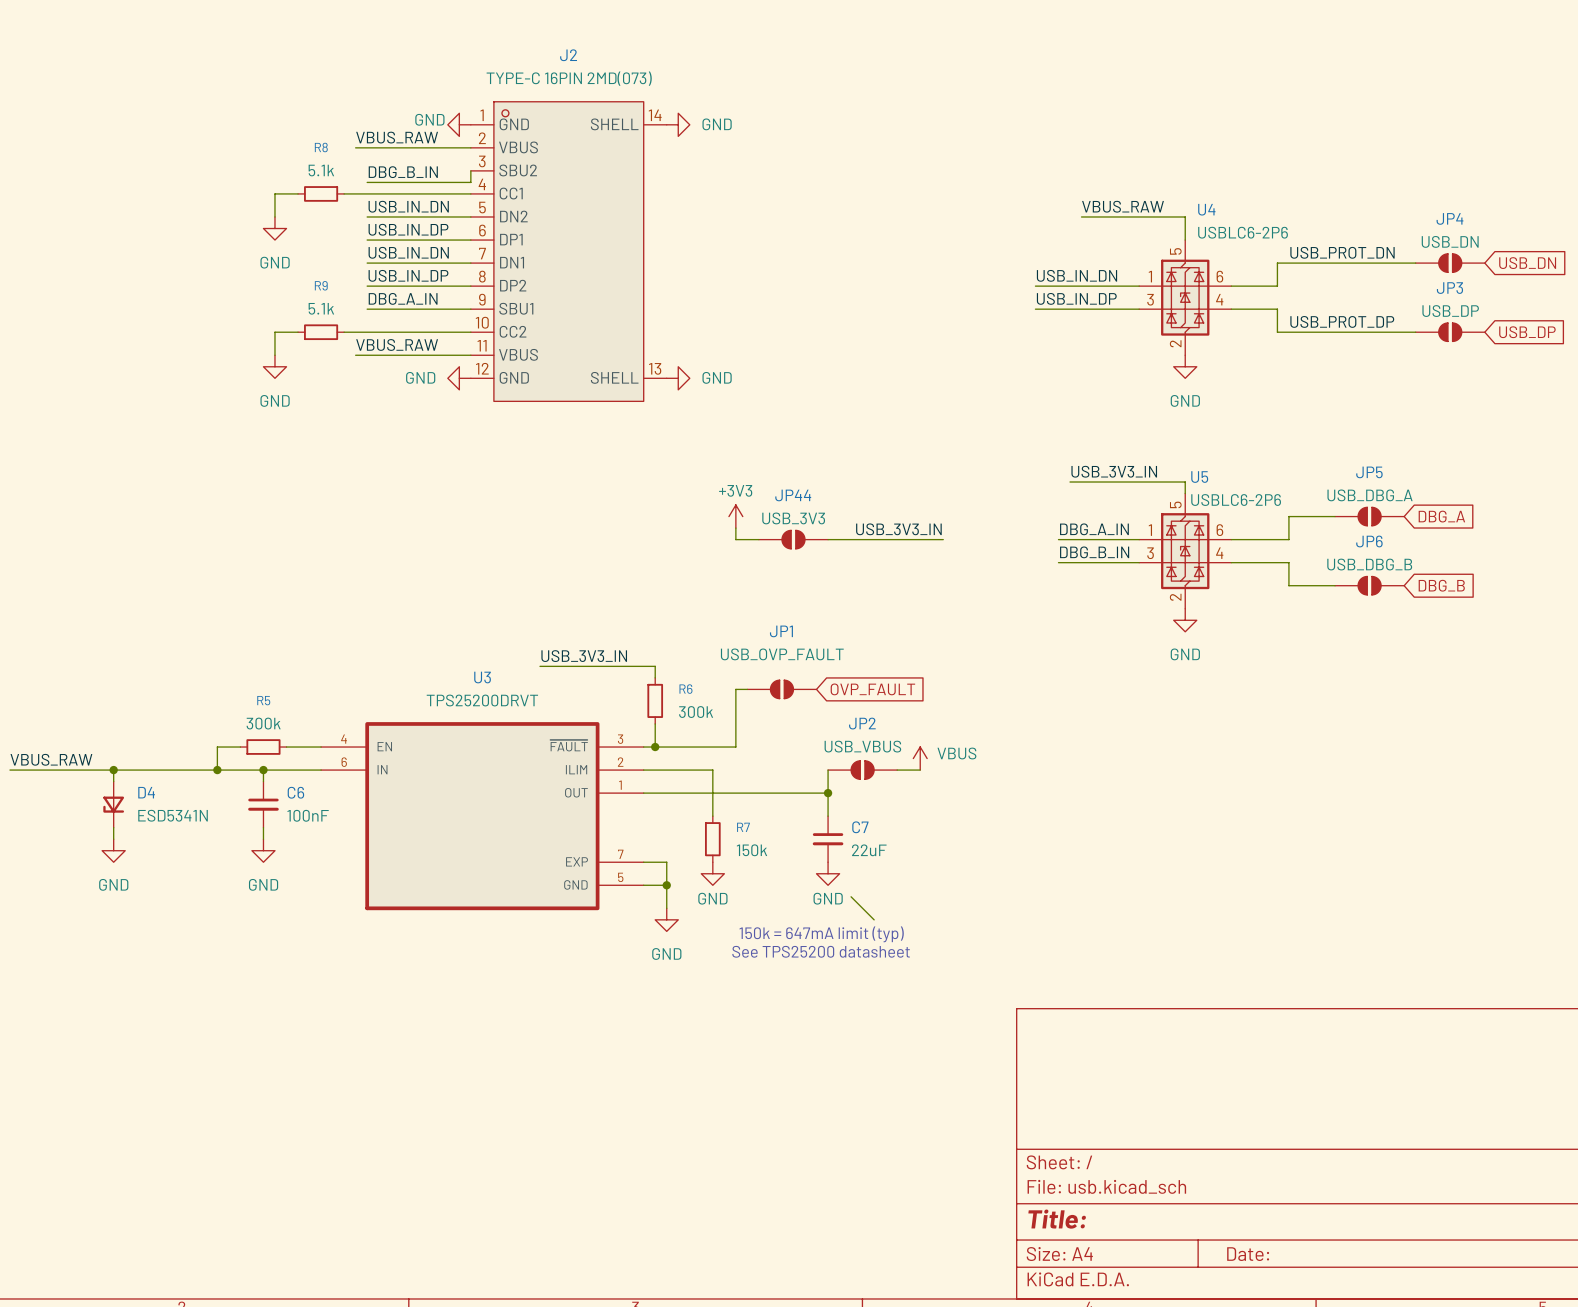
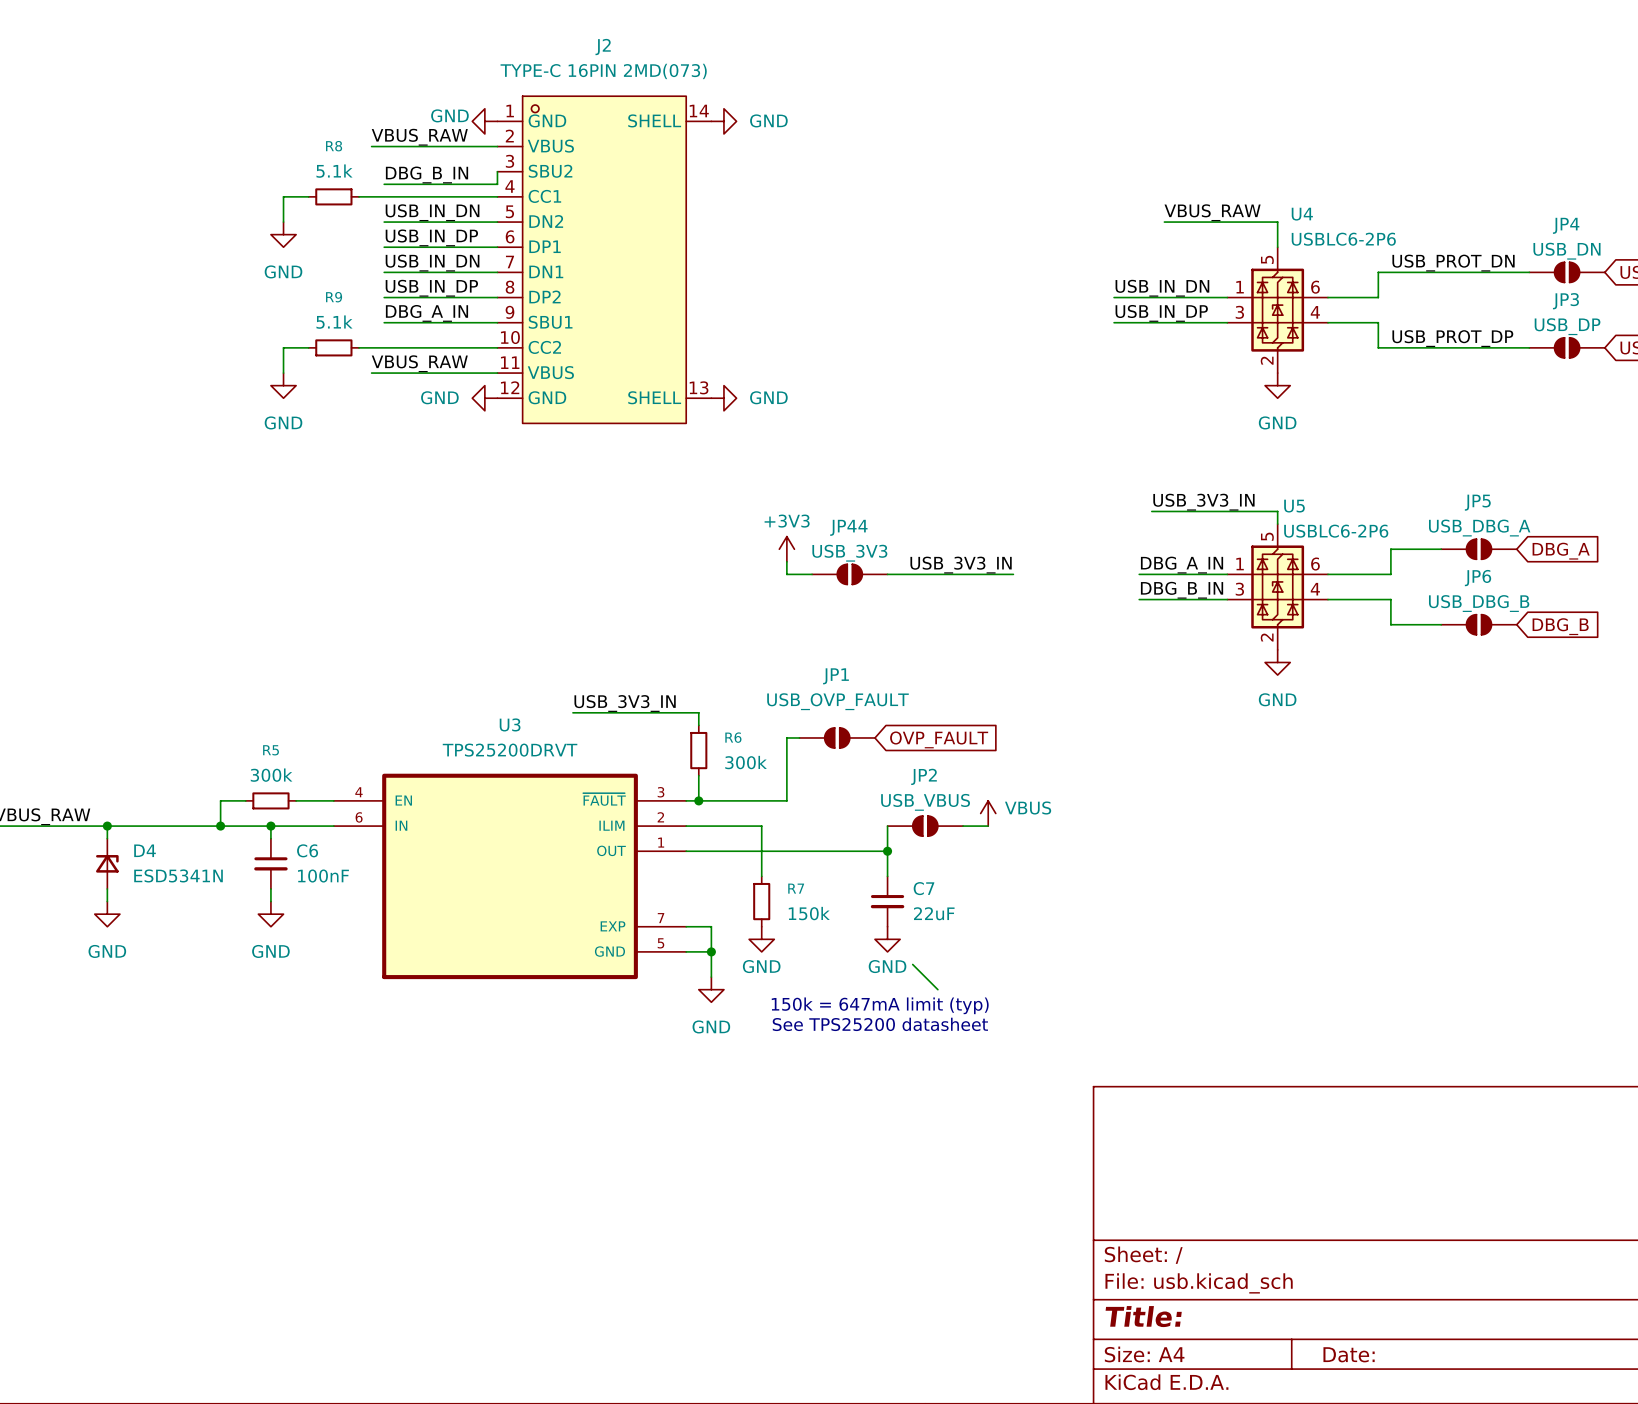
D4 rotation: 0° (113, 804) -> 180° (107, 863)

